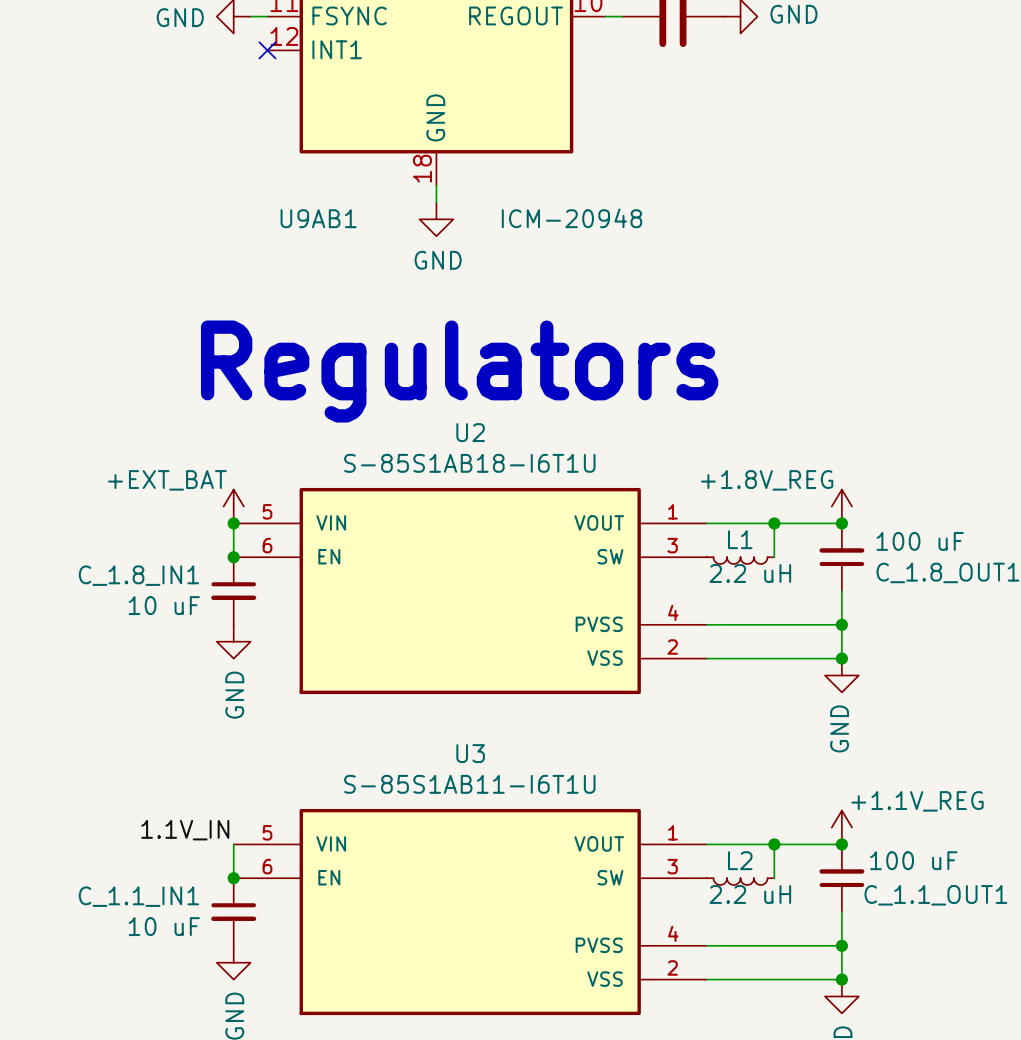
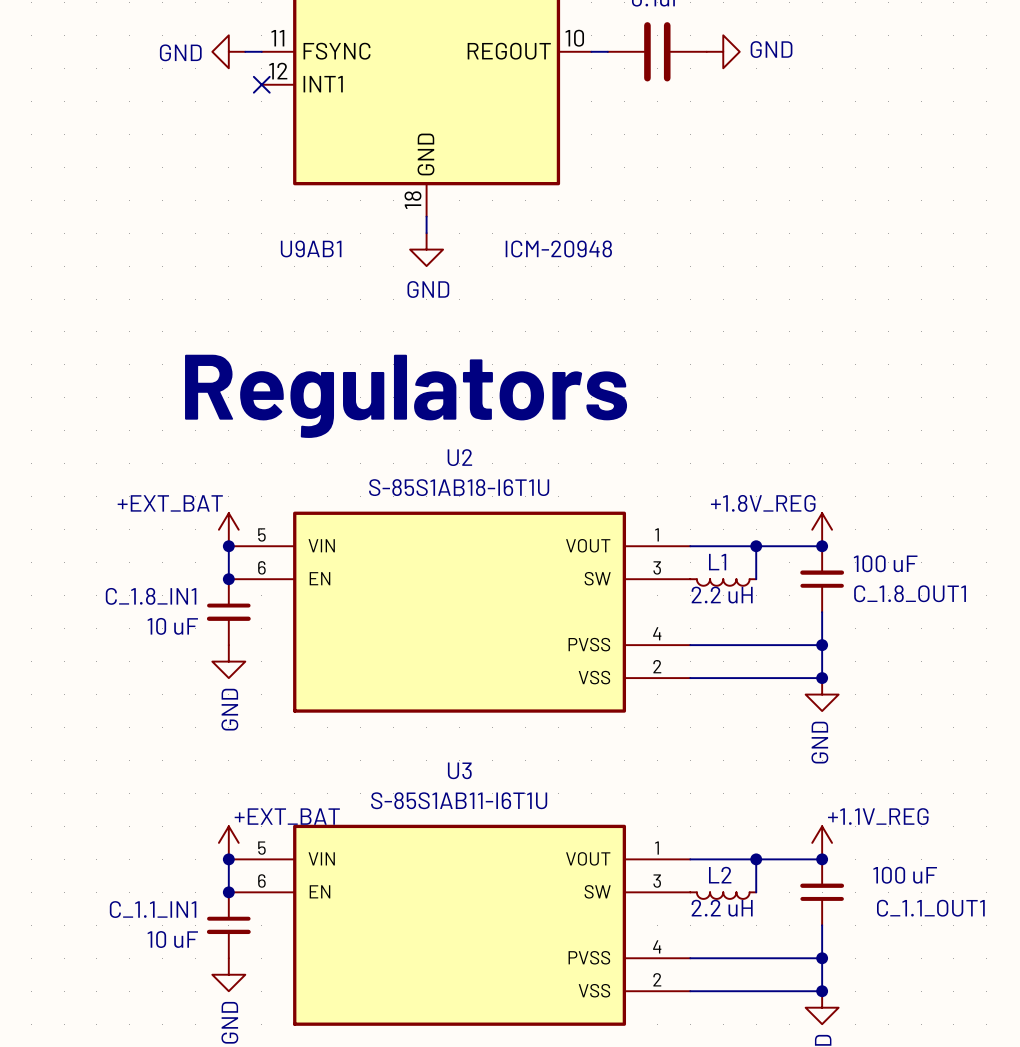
power symbol: none -> +EXT_BAT (228, 842)
label: 1.1V_IN (185, 830) -> none
junction: none -> (228, 859)

